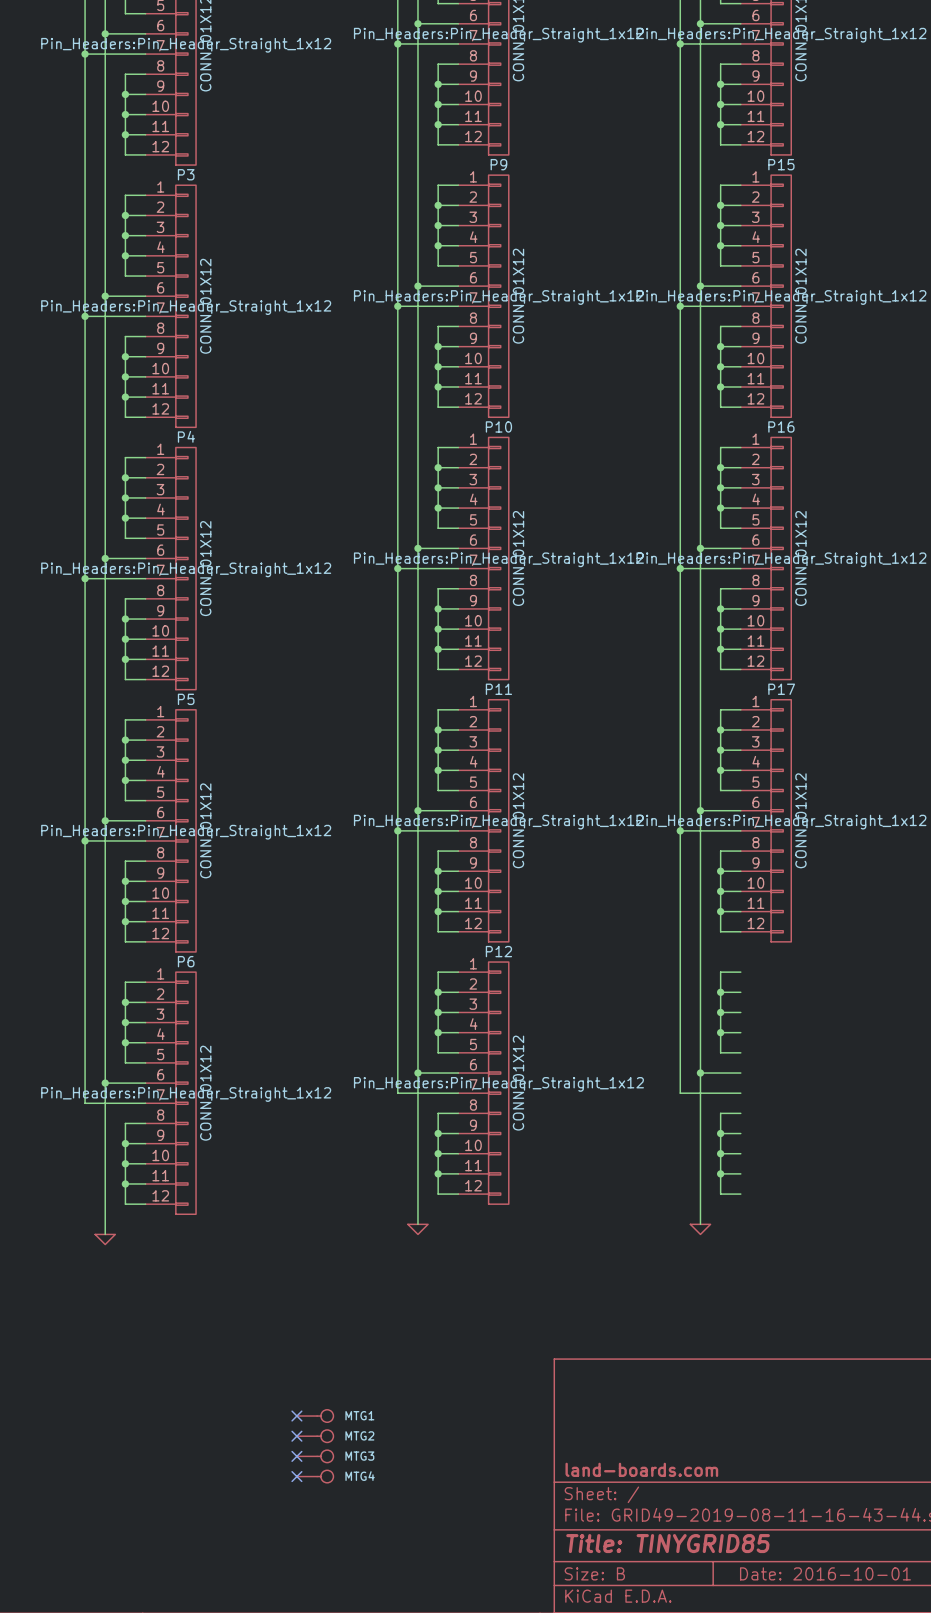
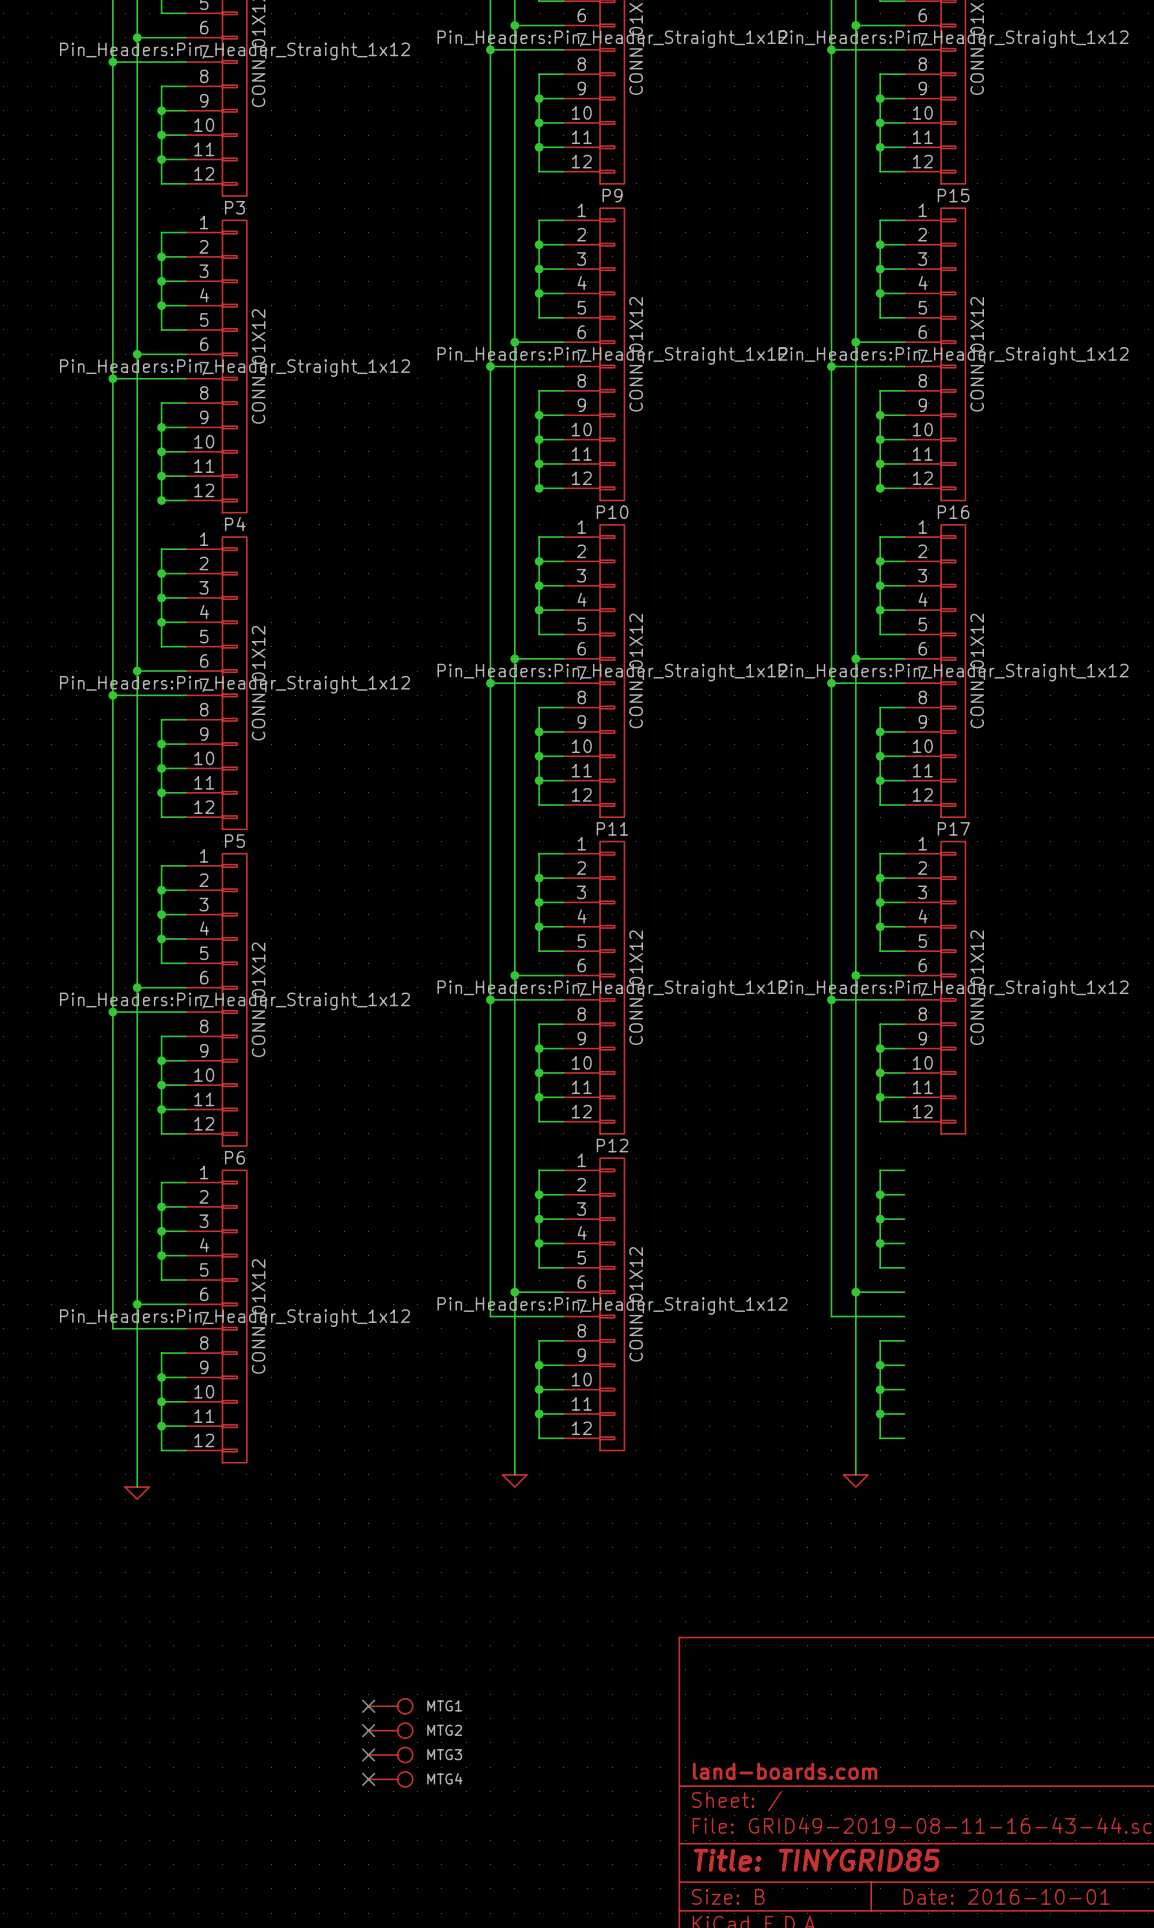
junction: none -> (539, 488)
junction: none -> (880, 488)
junction: none -> (161, 500)

